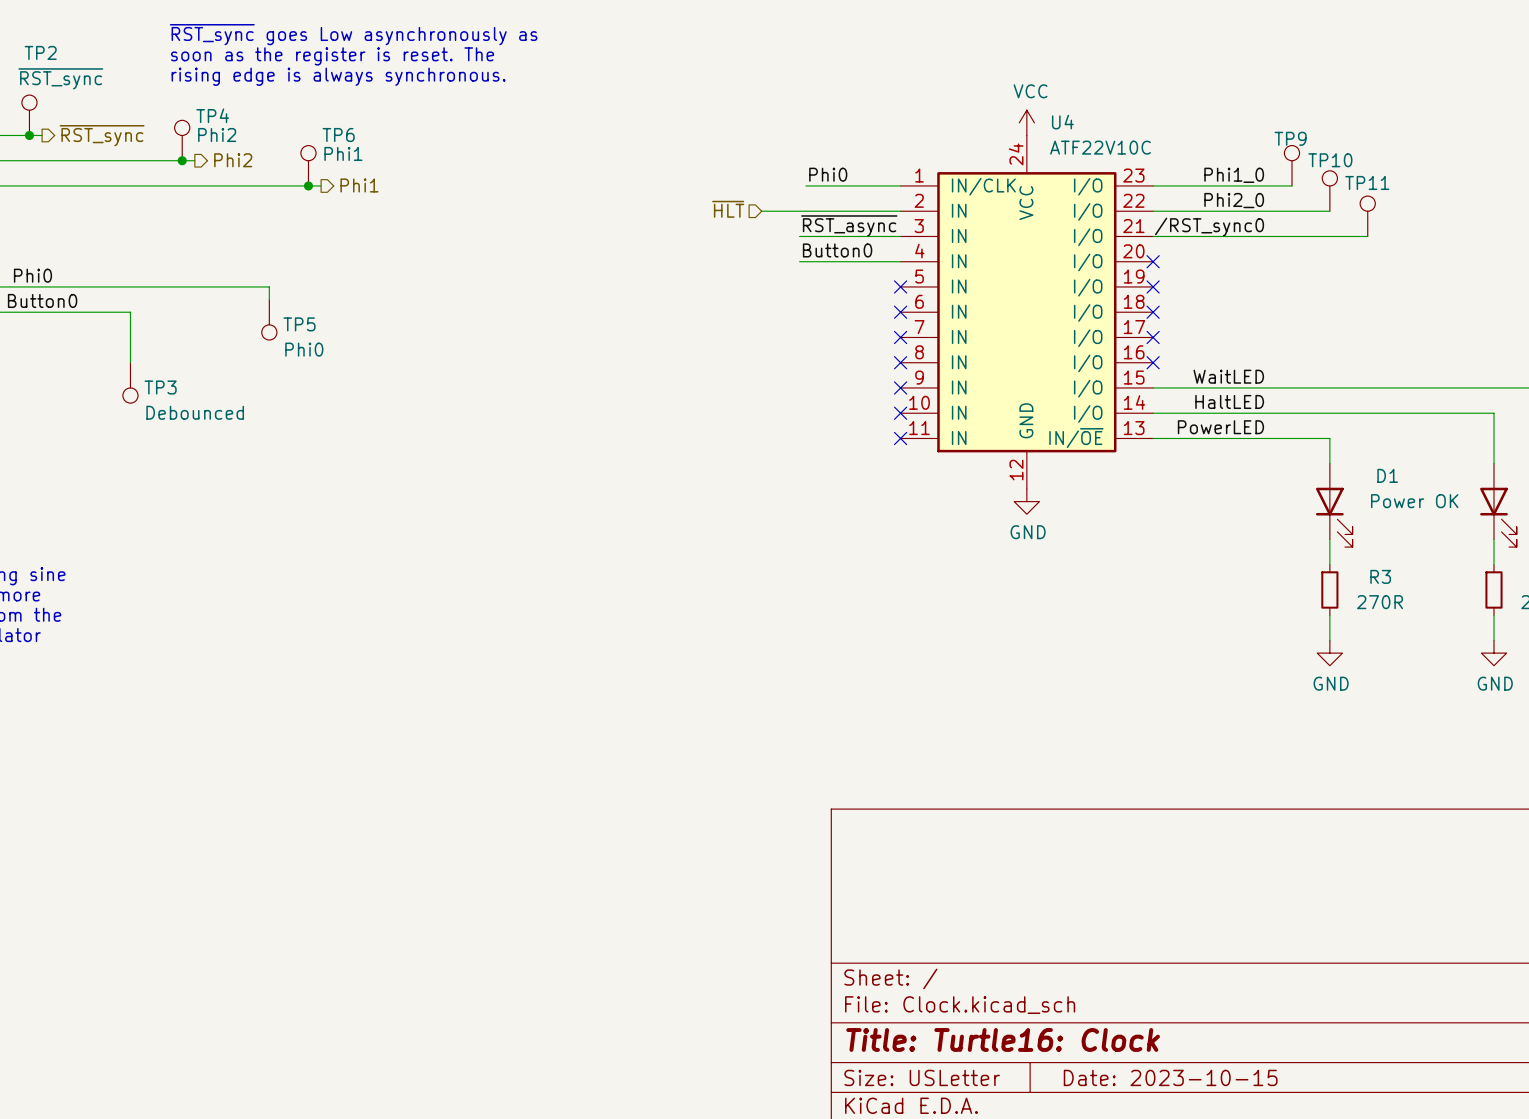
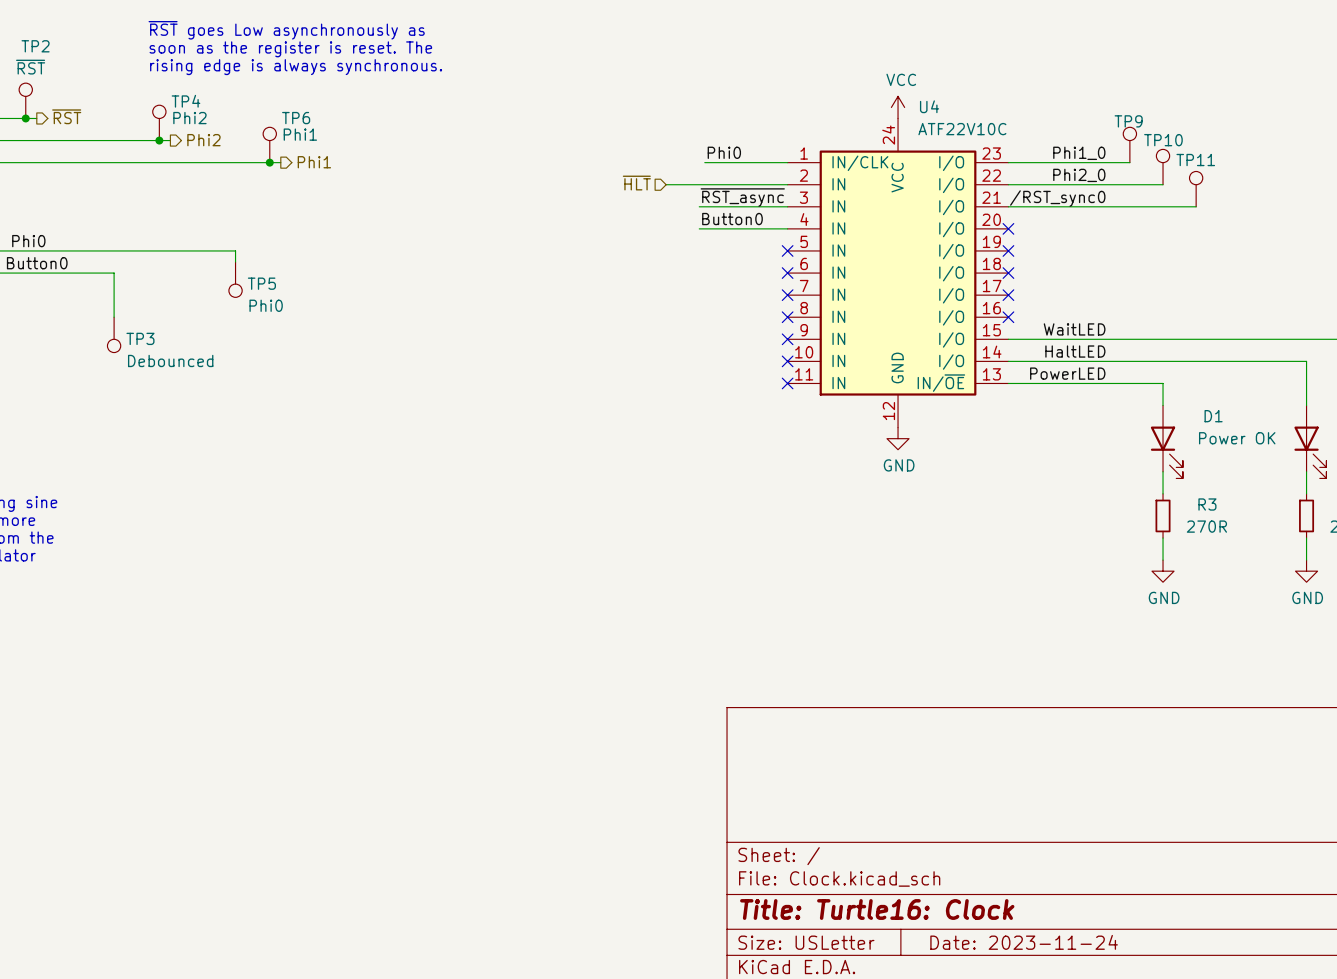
text: ~{RST_sync} goes Low asynchronously as (353, 34) -> ~{RST} goes Low asynchronously as (286, 30)
TP2 value: ~{RST_sync} (60, 78) -> ~{RST} (30, 67)
hierarchical label: ~{RST_sync} (102, 135) -> ~{RST} (66, 116)
title block: Date: 2023-10-15 (1170, 1077) -> Date: 2023-11-24 (1024, 942)

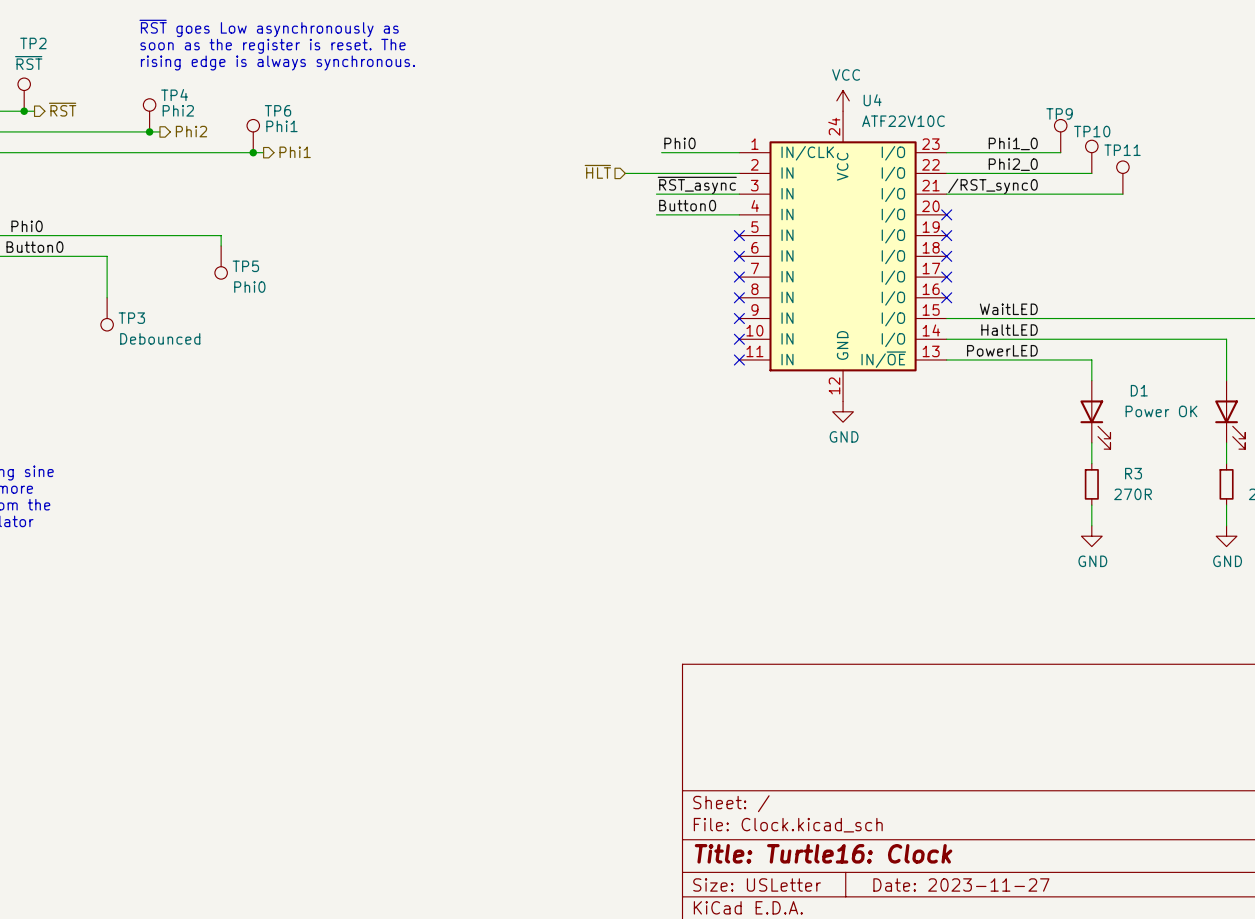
title block: Date: 2023-11-24 (1024, 942) -> Date: 2023-11-27 (961, 884)

